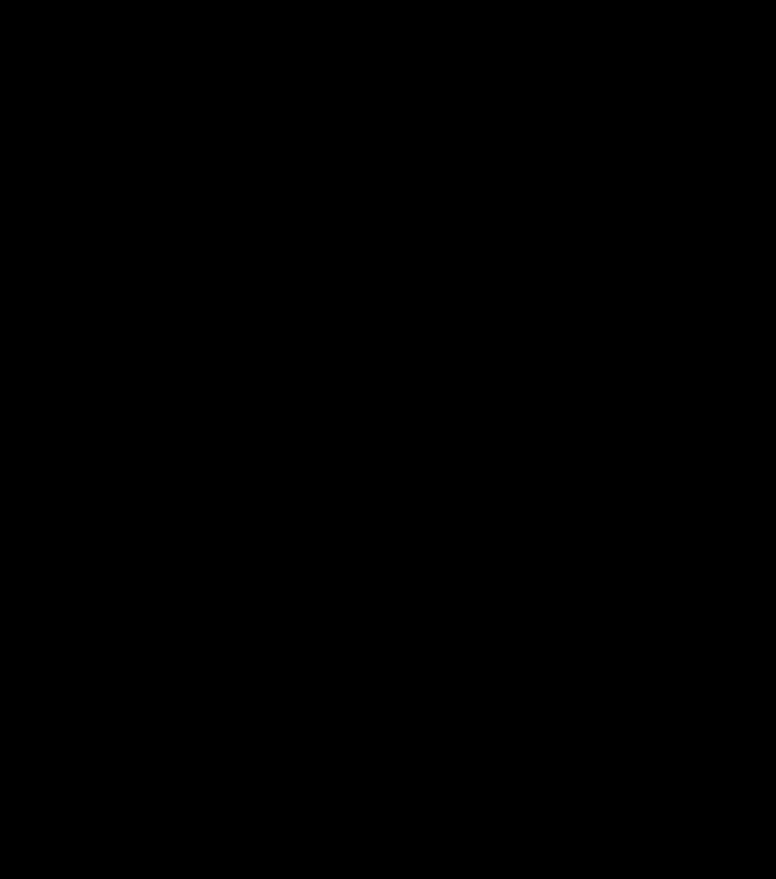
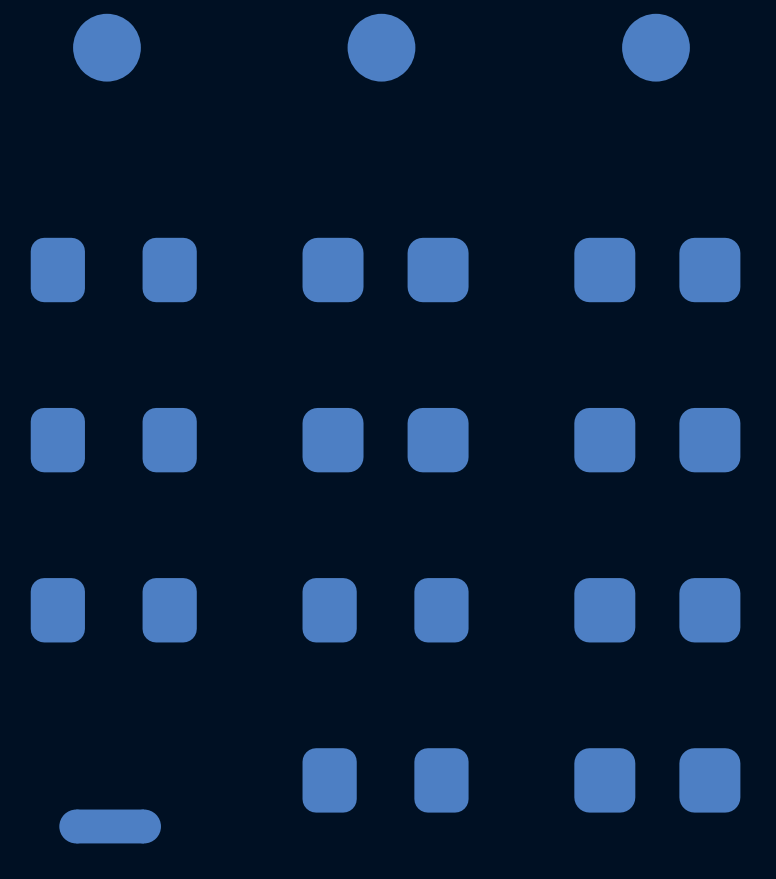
part: none -> (106, 47)
part: none -> (381, 47)
part: none -> (655, 47)
part: none -> (113, 270)
part: none -> (385, 270)
part: none -> (657, 270)
part: none -> (113, 440)
part: none -> (385, 440)
part: none -> (657, 440)
part: none -> (113, 610)
part: none -> (385, 610)
part: none -> (657, 610)
part: none -> (385, 780)
part: none -> (657, 780)
part: none -> (110, 826)

